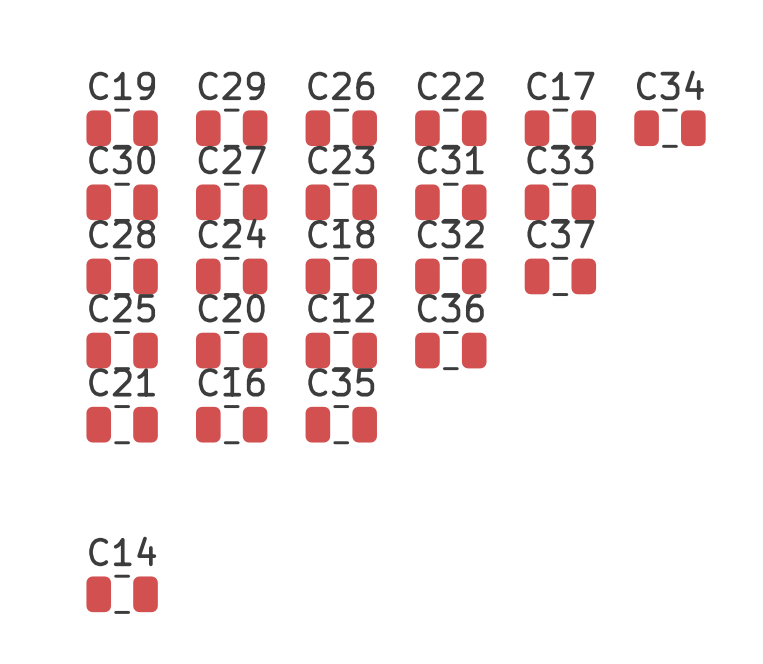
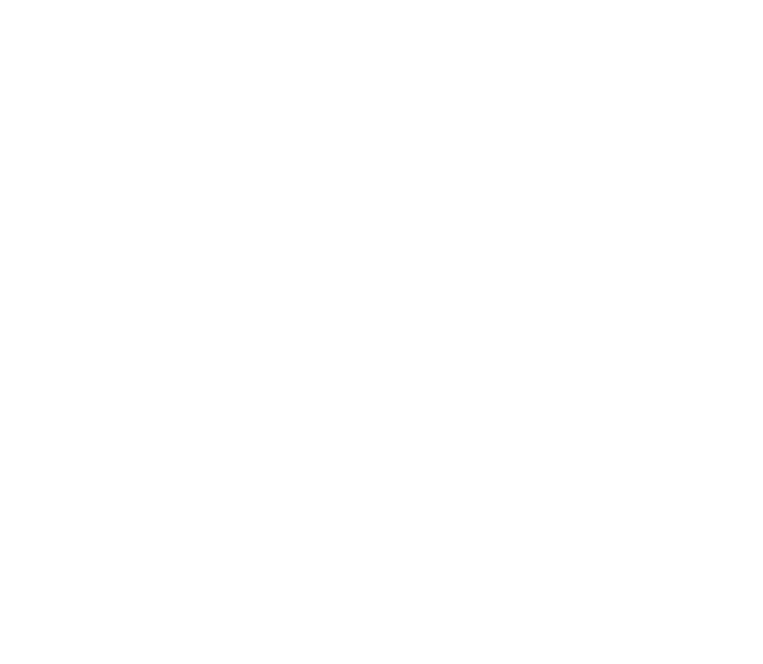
C19: (122, 128) -> none
C29: (231, 128) -> none
C26: (341, 128) -> none
C22: (450, 128) -> none
C17: (560, 128) -> none
C34: (669, 128) -> none
C30: (122, 202) -> none
C27: (231, 202) -> none
C23: (341, 202) -> none
C31: (450, 202) -> none
C33: (560, 202) -> none
C28: (122, 276) -> none
C24: (231, 276) -> none
C18: (341, 276) -> none
C32: (450, 276) -> none
C37: (560, 276) -> none
C25: (122, 350) -> none
C20: (231, 350) -> none
C12: (341, 350) -> none
C36: (450, 350) -> none
C21: (122, 424) -> none
C16: (231, 424) -> none
C35: (341, 424) -> none
C14: (122, 594) -> none

